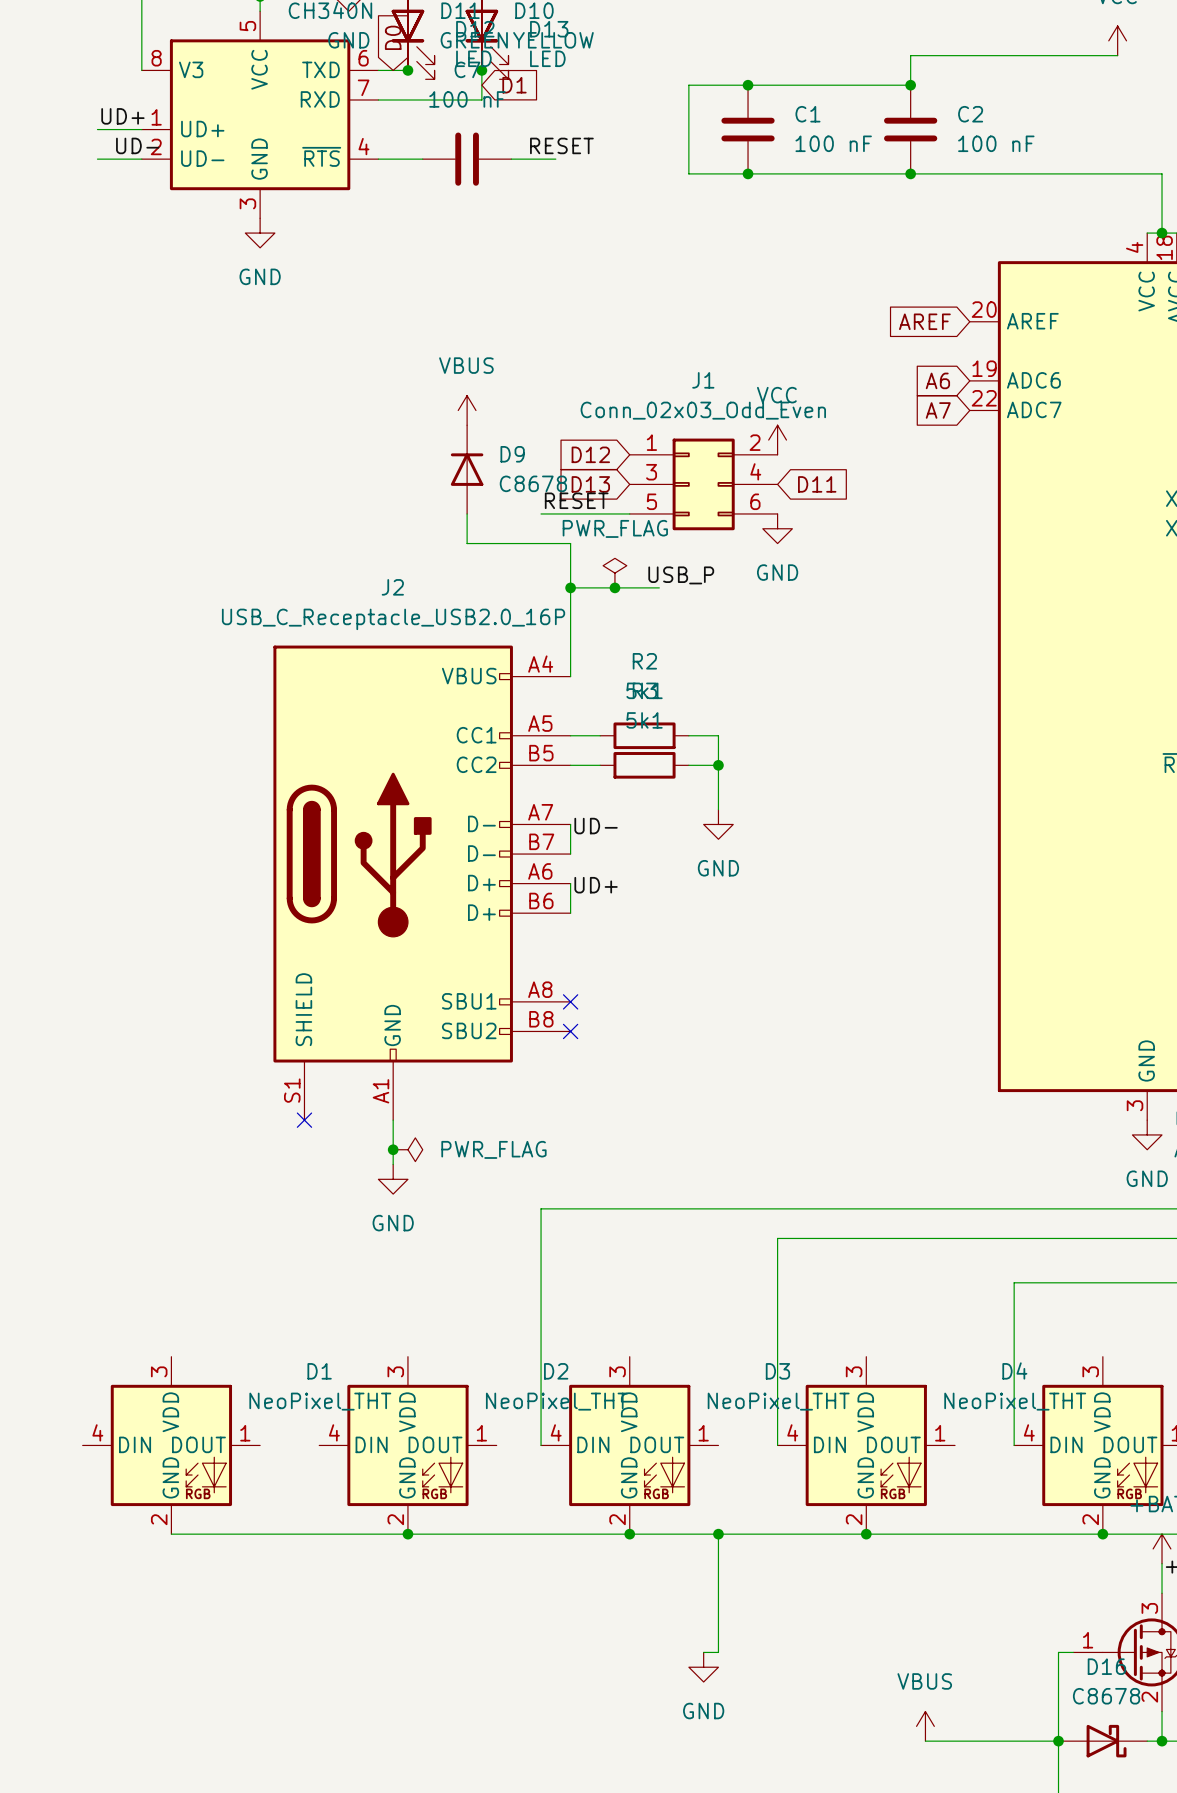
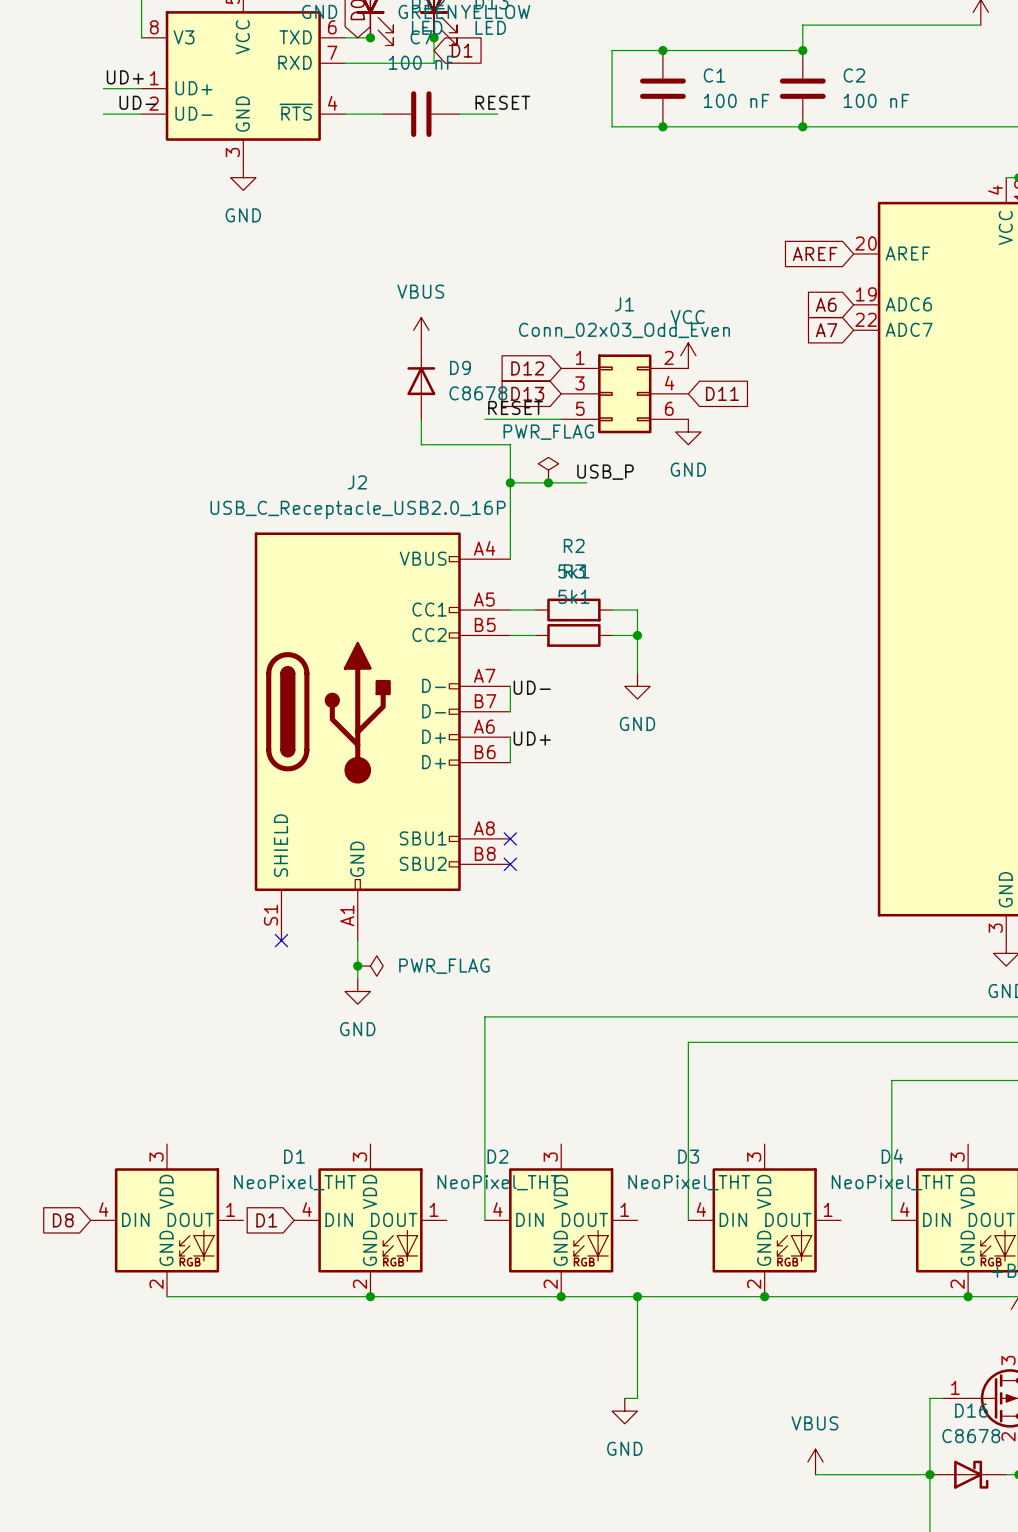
global label: none -> D8 (63, 1220)
global label: none -> D1 (266, 1220)

